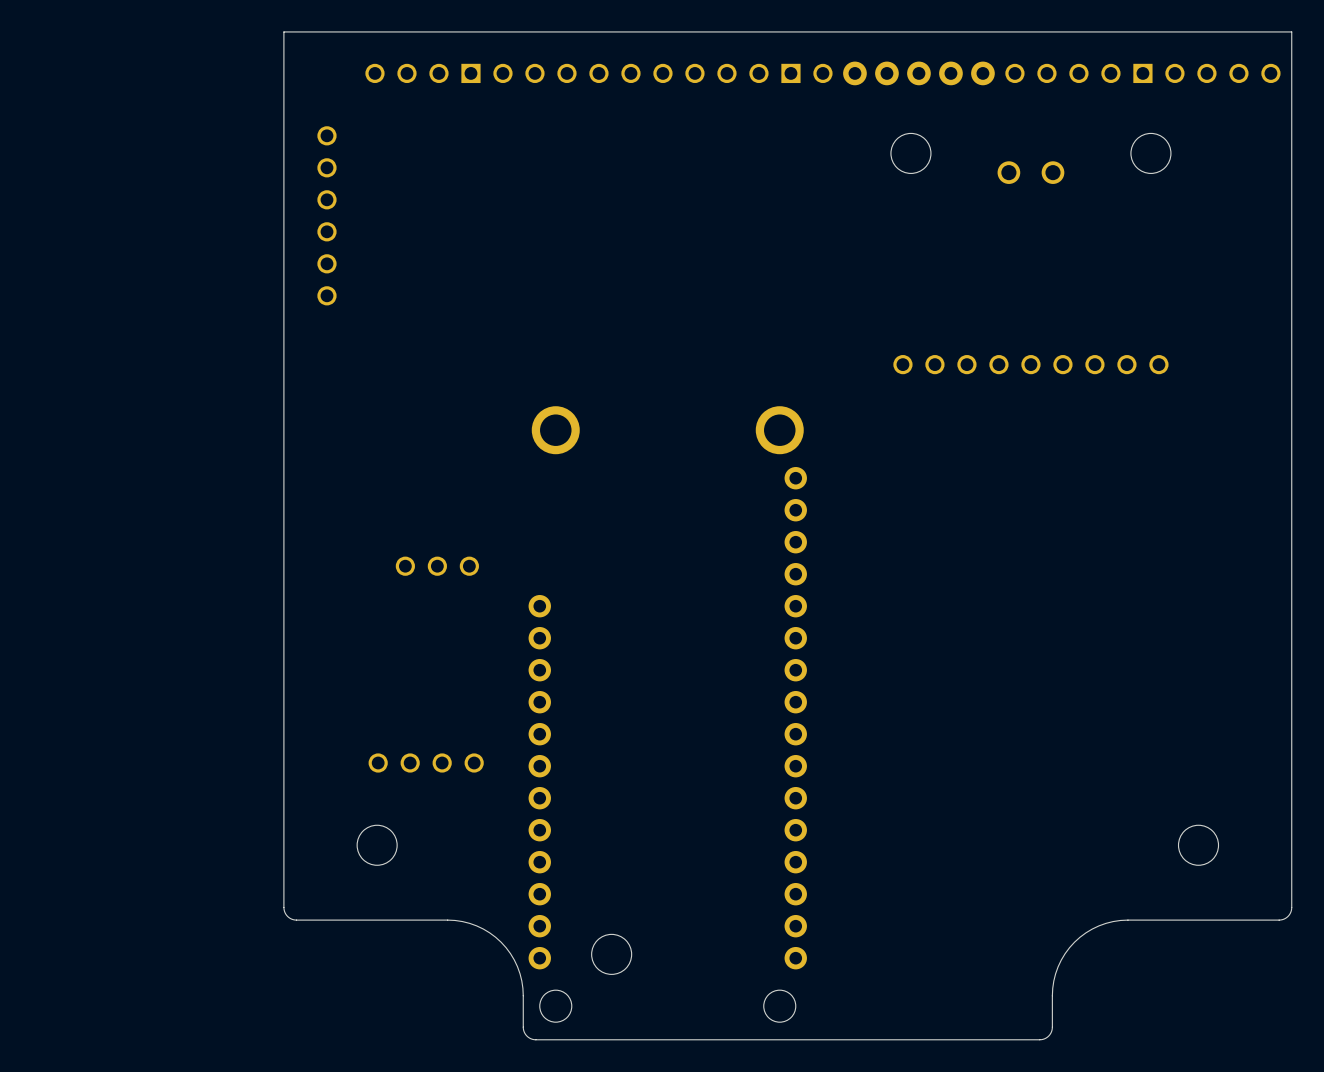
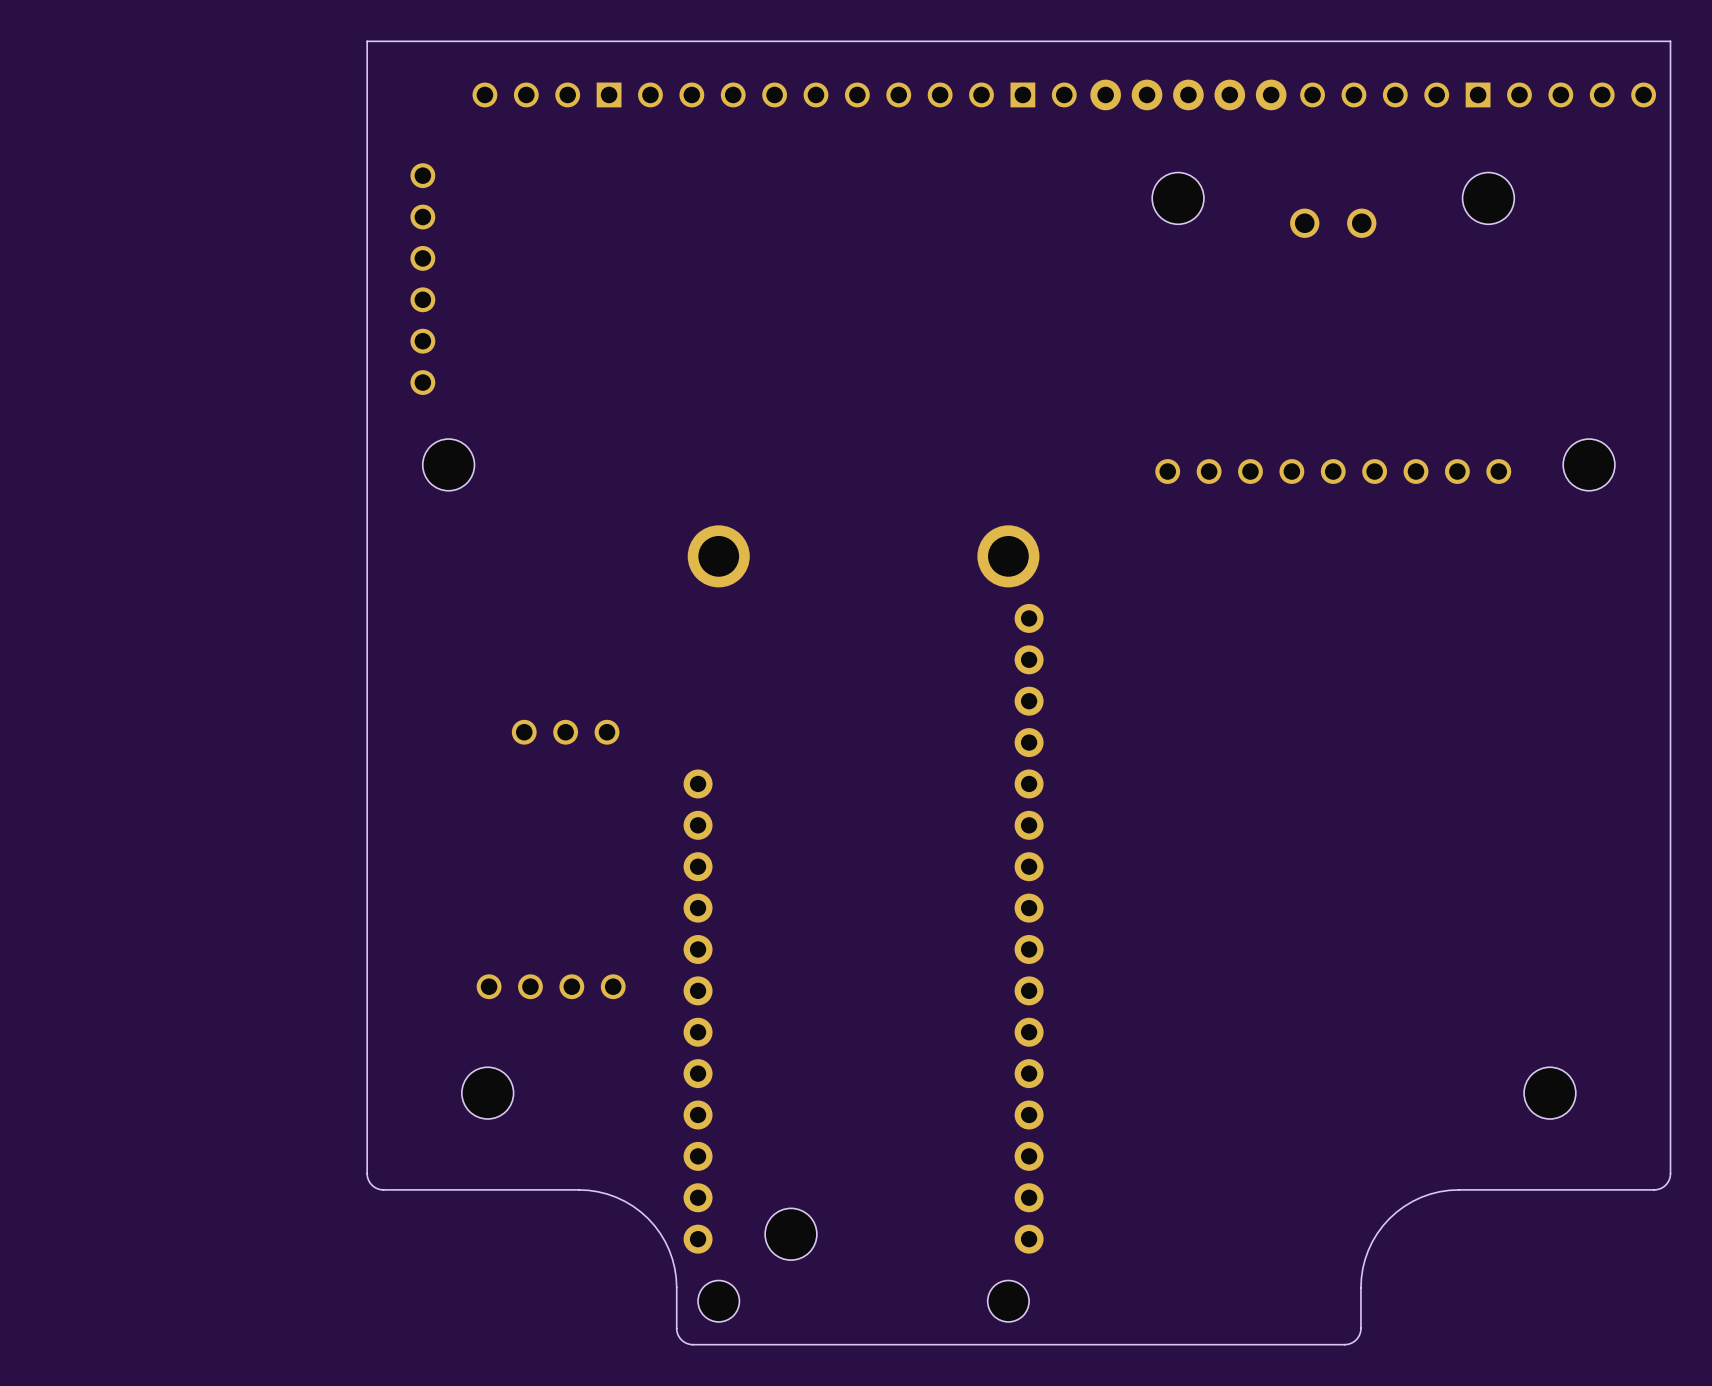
part: none -> (448, 464)
part: none -> (1589, 464)

